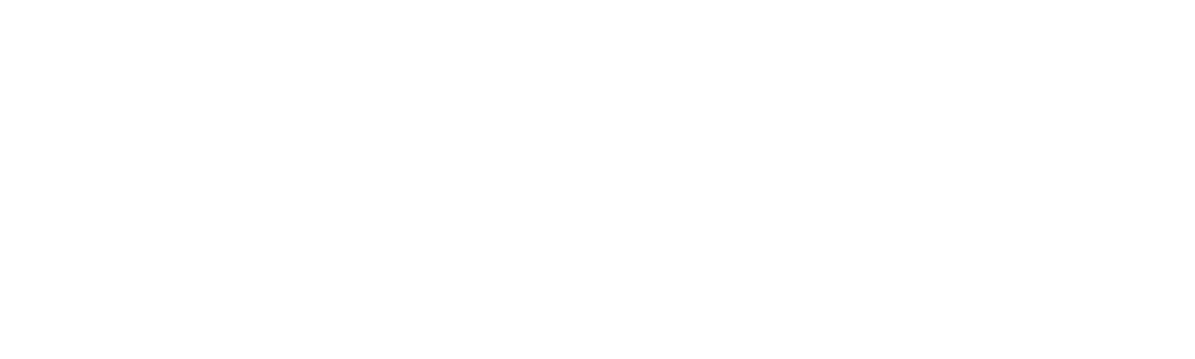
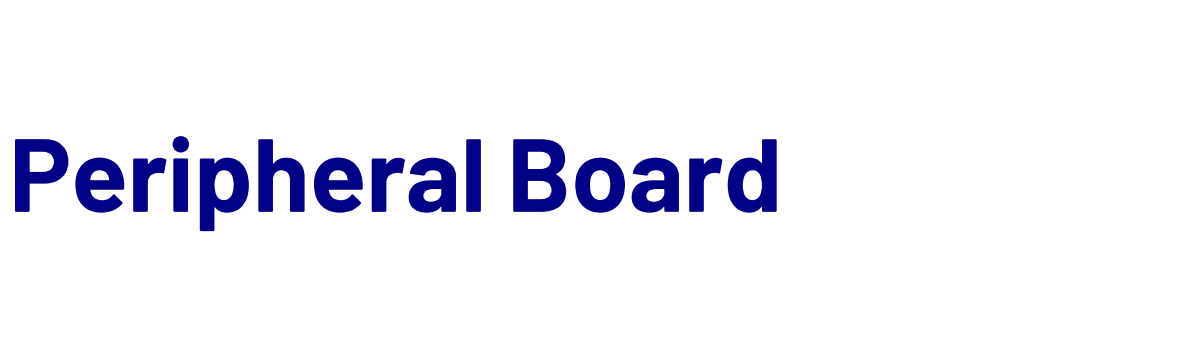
text: none -> Peripheral Board (395, 183)

